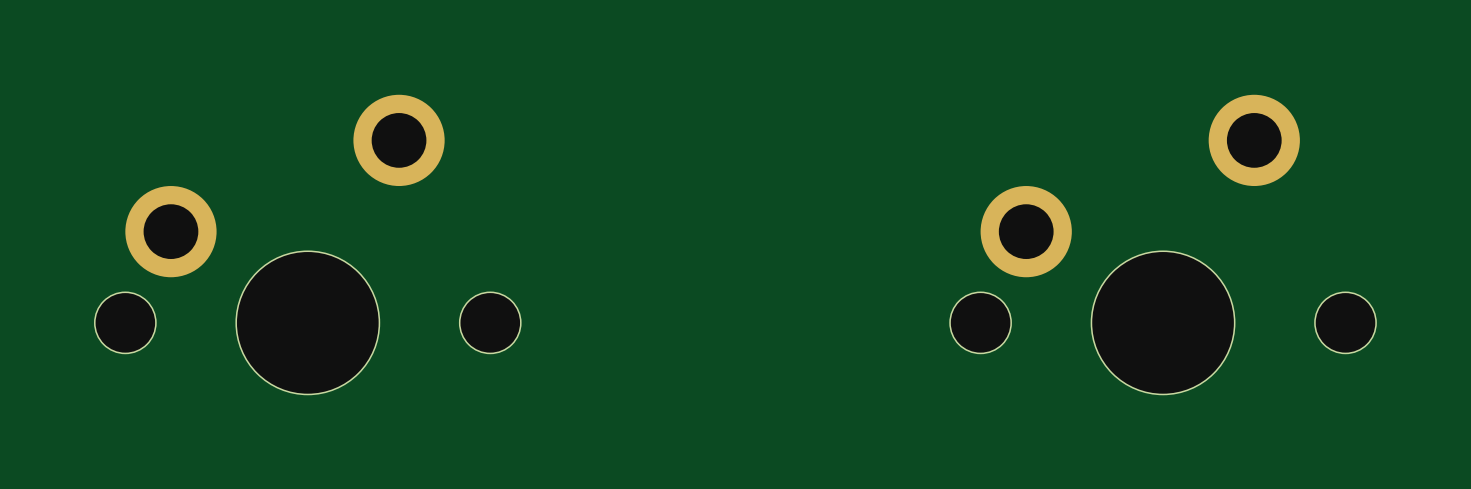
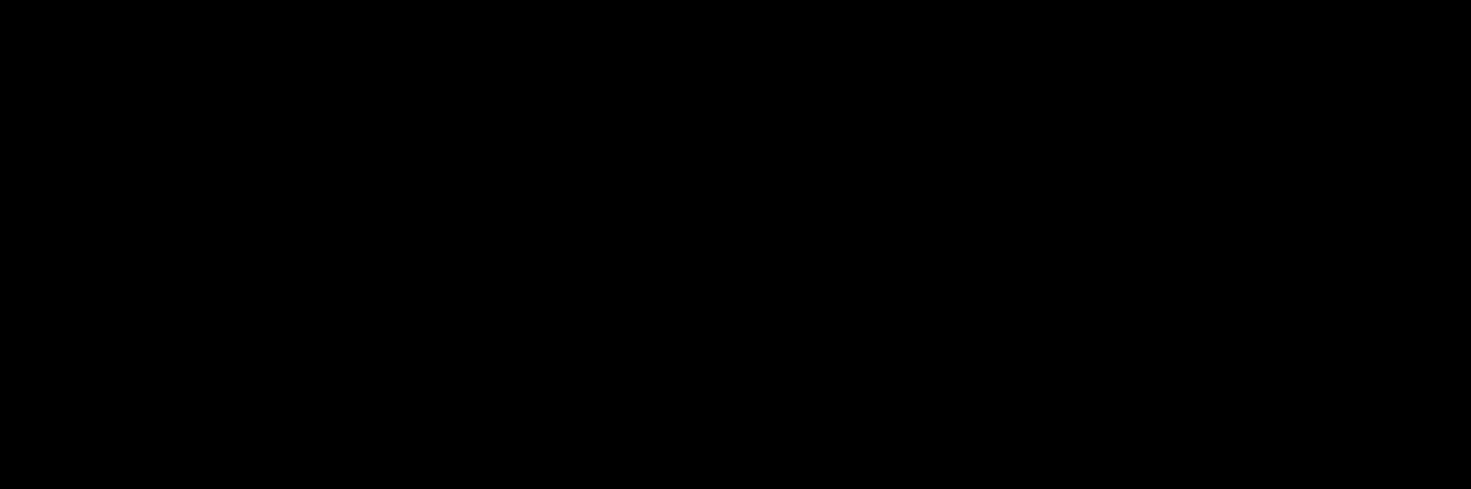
part: (307, 244) -> none
part: (1163, 244) -> none

